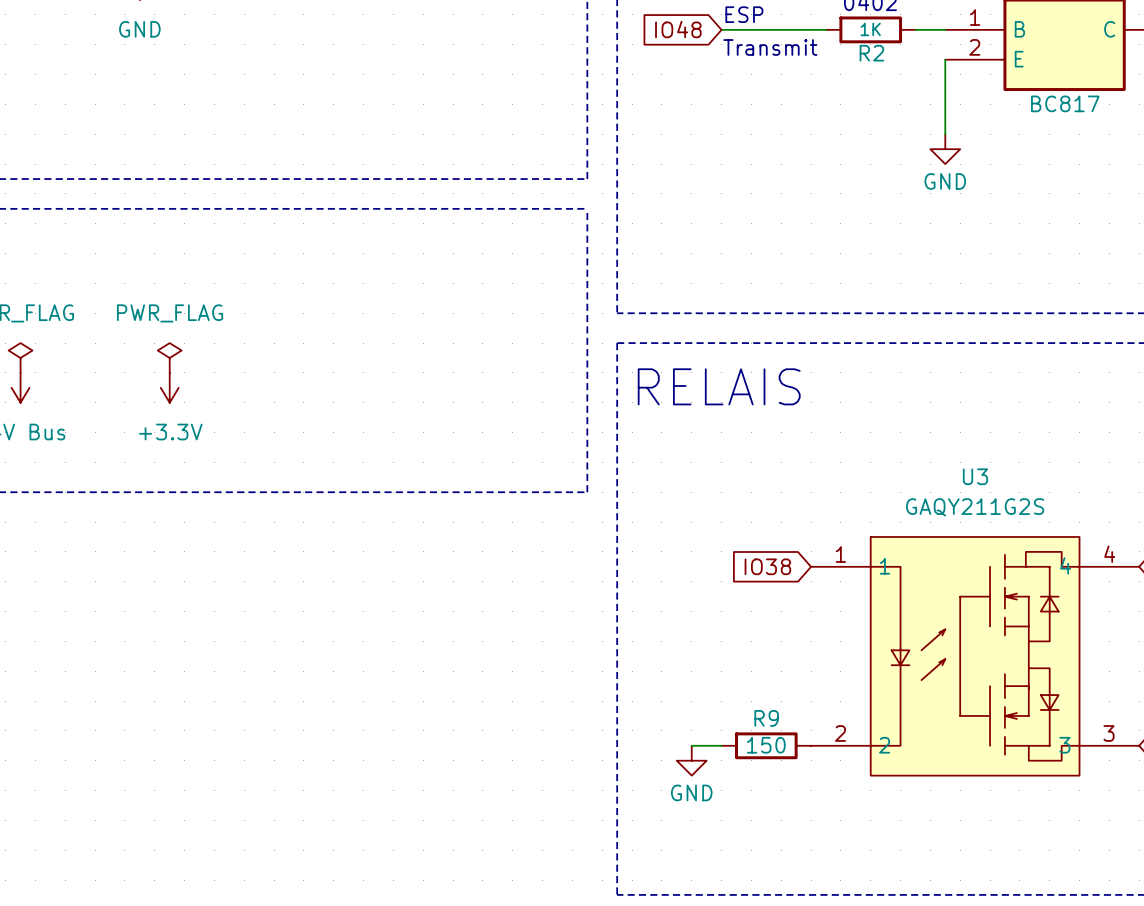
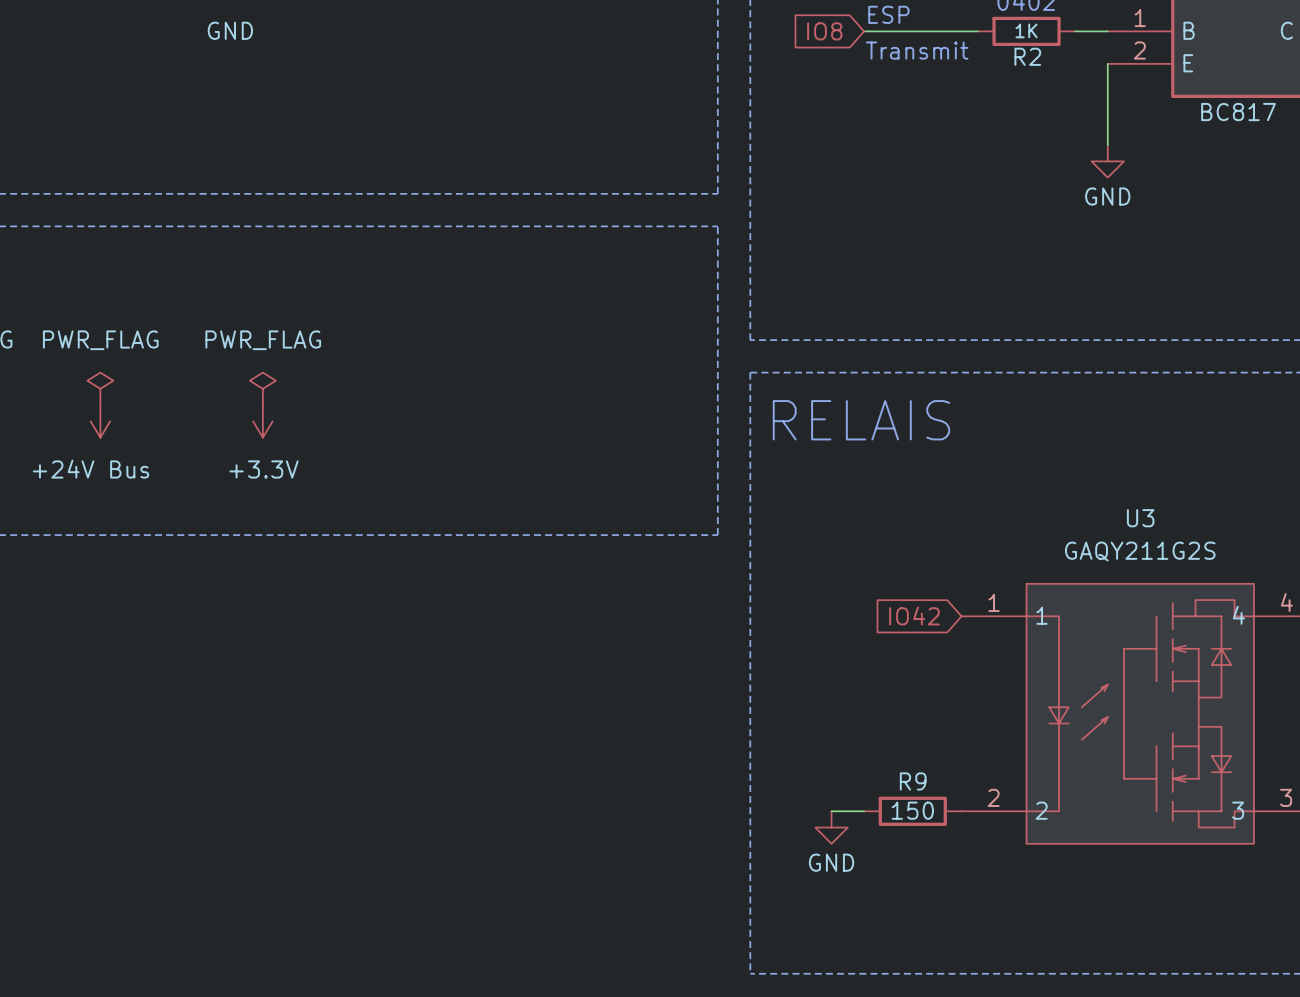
global label: IO48 (678, 29) -> IO8 (824, 31)
global label: IO38 (767, 566) -> IO42 (914, 615)

